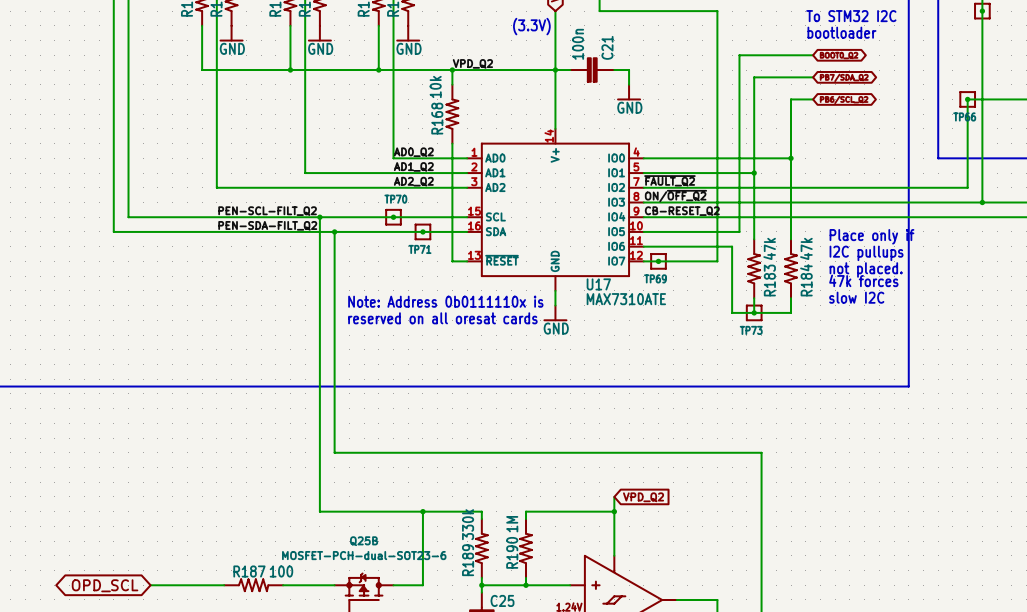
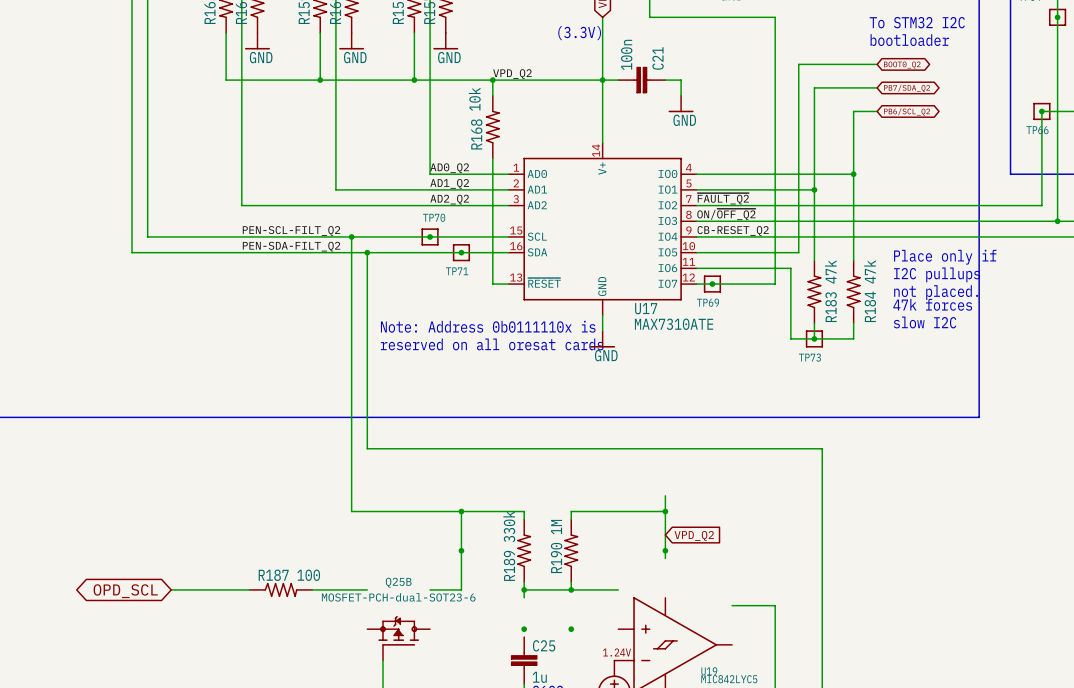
wire: (334, 415) (334, 452) (761, 452) -> (367, 448) (822, 448) (822, 487)
wire: (319, 474) (319, 511) (481, 511) (481, 519) -> (351, 511) (524, 511) (524, 519)
wire: none -> (461, 511) (461, 550)
junction: none -> (461, 511)
junction: none -> (665, 511)
wire: (614, 511) (526, 511) (526, 519) -> (665, 511) (571, 511) (571, 519)
wire: (614, 519) (614, 555) -> (665, 495) (665, 535)
wire: (422, 548) (422, 585) (393, 585) -> (461, 589) (430, 589)
junction: none -> (524, 589)
R189 position: (481, 548) -> (524, 550)
junction: none -> (571, 589)
R190 position: (526, 548) -> (571, 550)
wire: (481, 577) (481, 592) -> (524, 582) (524, 597)
wire: (526, 577) (526, 585) -> (571, 582) (571, 589)
global label position: OPD_SCL (105, 585) -> OPD_SCL (125, 591)
wire: (150, 585) (224, 585) -> (171, 589) (249, 589)
R187 position: (253, 585) -> (281, 589)
wire: (283, 585) (334, 585) -> (312, 589) (367, 589)
wire: (481, 585) (570, 585) -> (524, 589) (618, 589)
wire: (676, 599) (717, 599) -> (732, 605) (775, 605) (775, 644)

